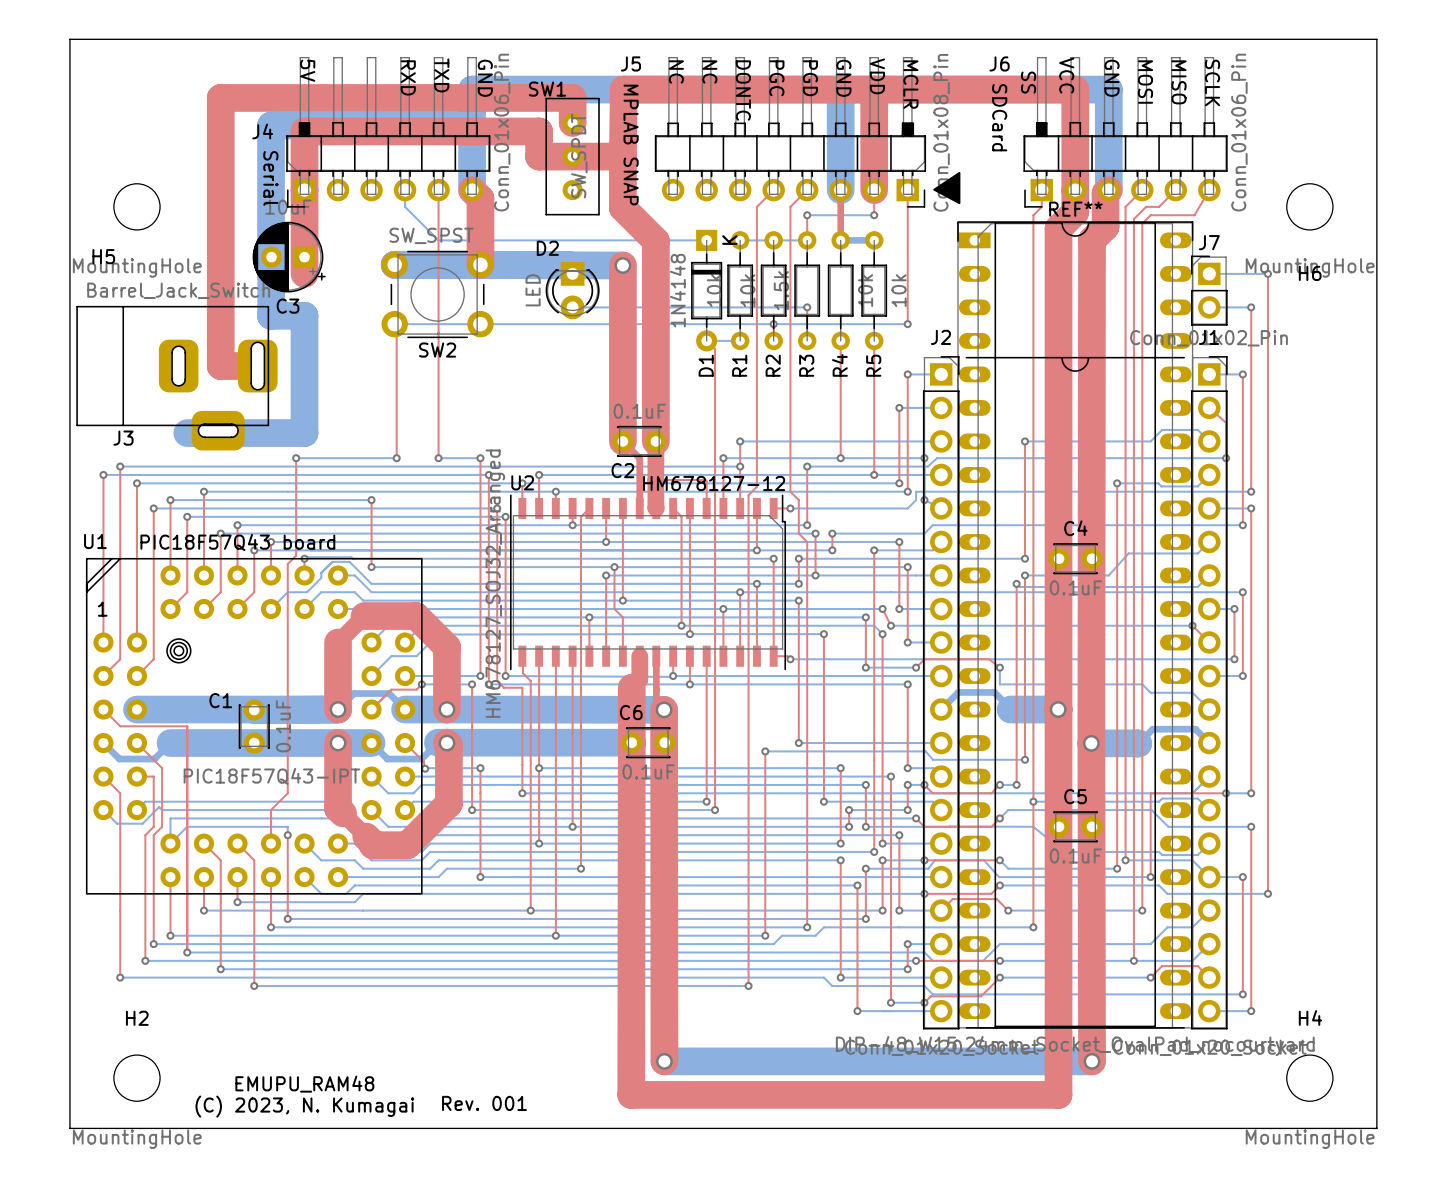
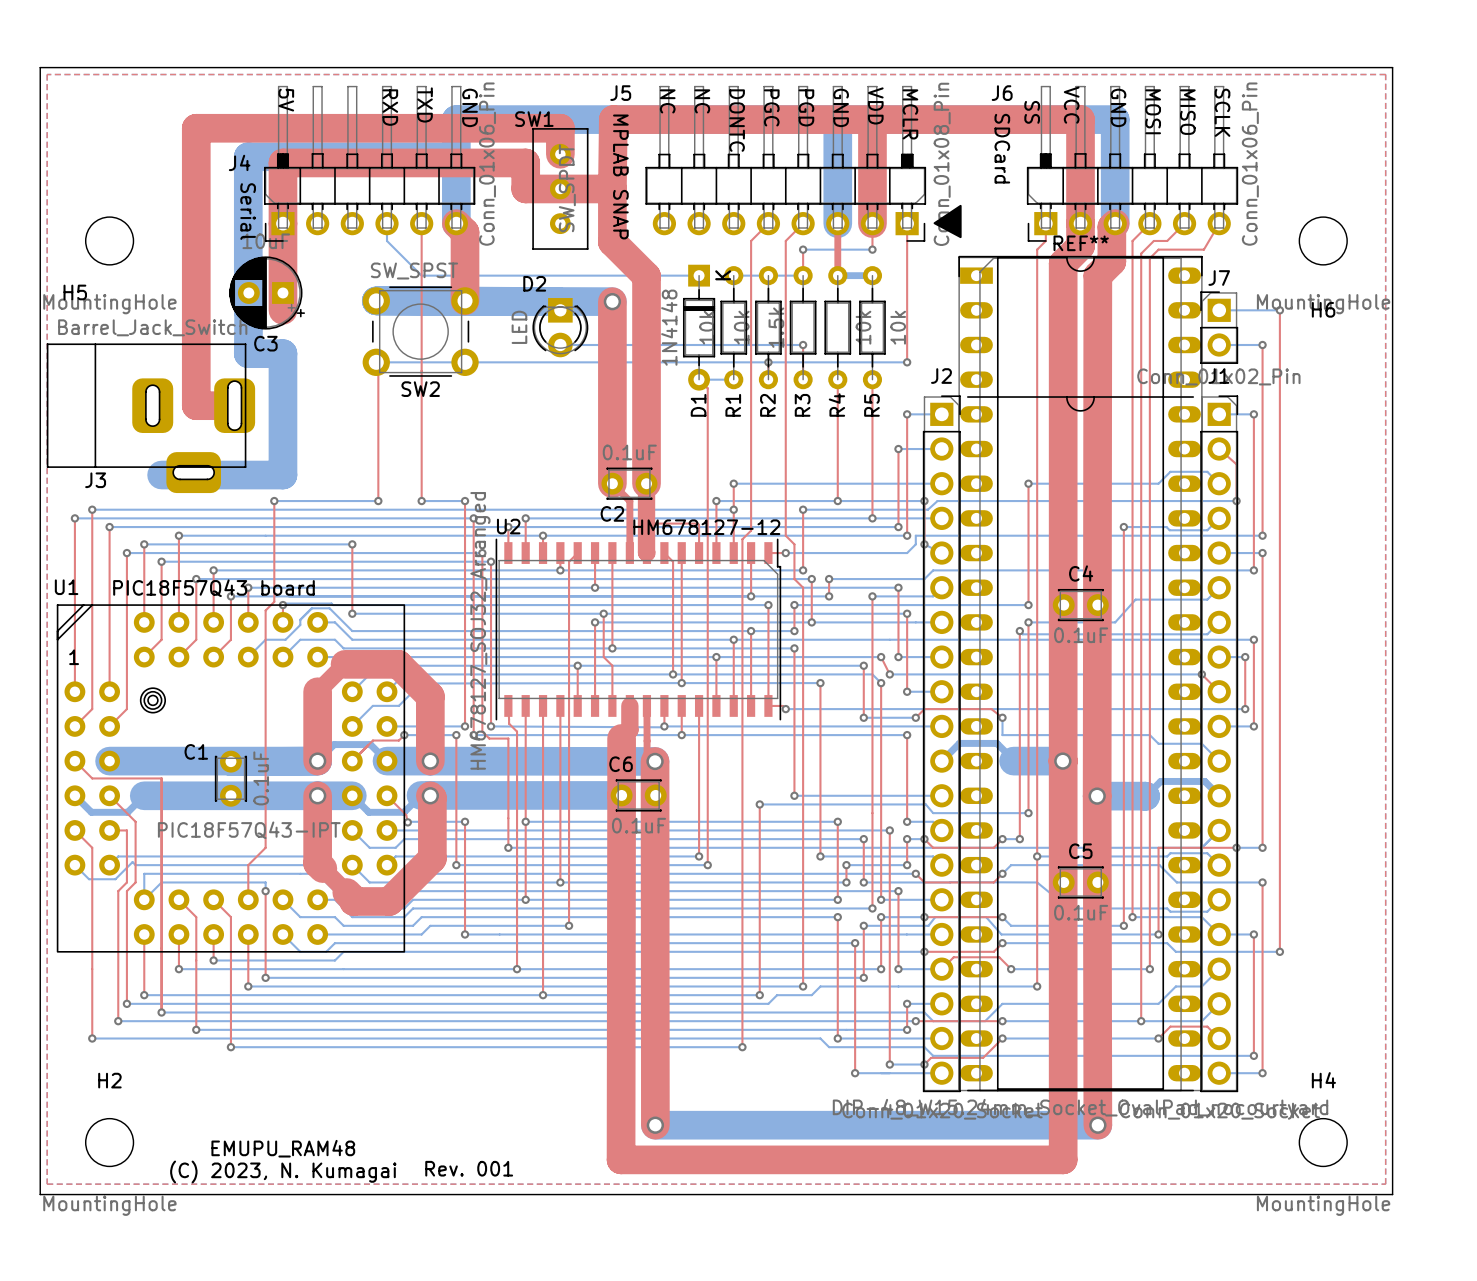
top zone outline: none -> (47, 74) (47, 1184) (1385, 1184) (1385, 74) (47, 74)

